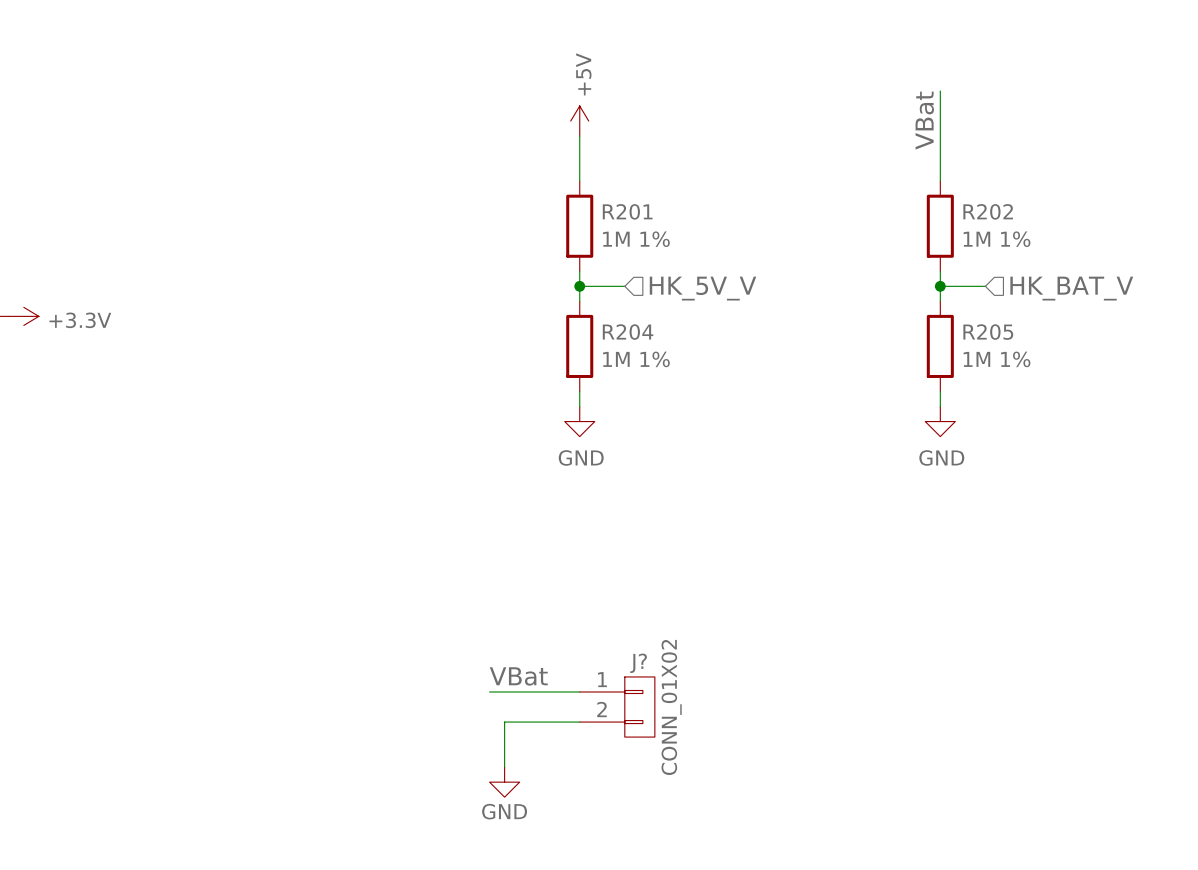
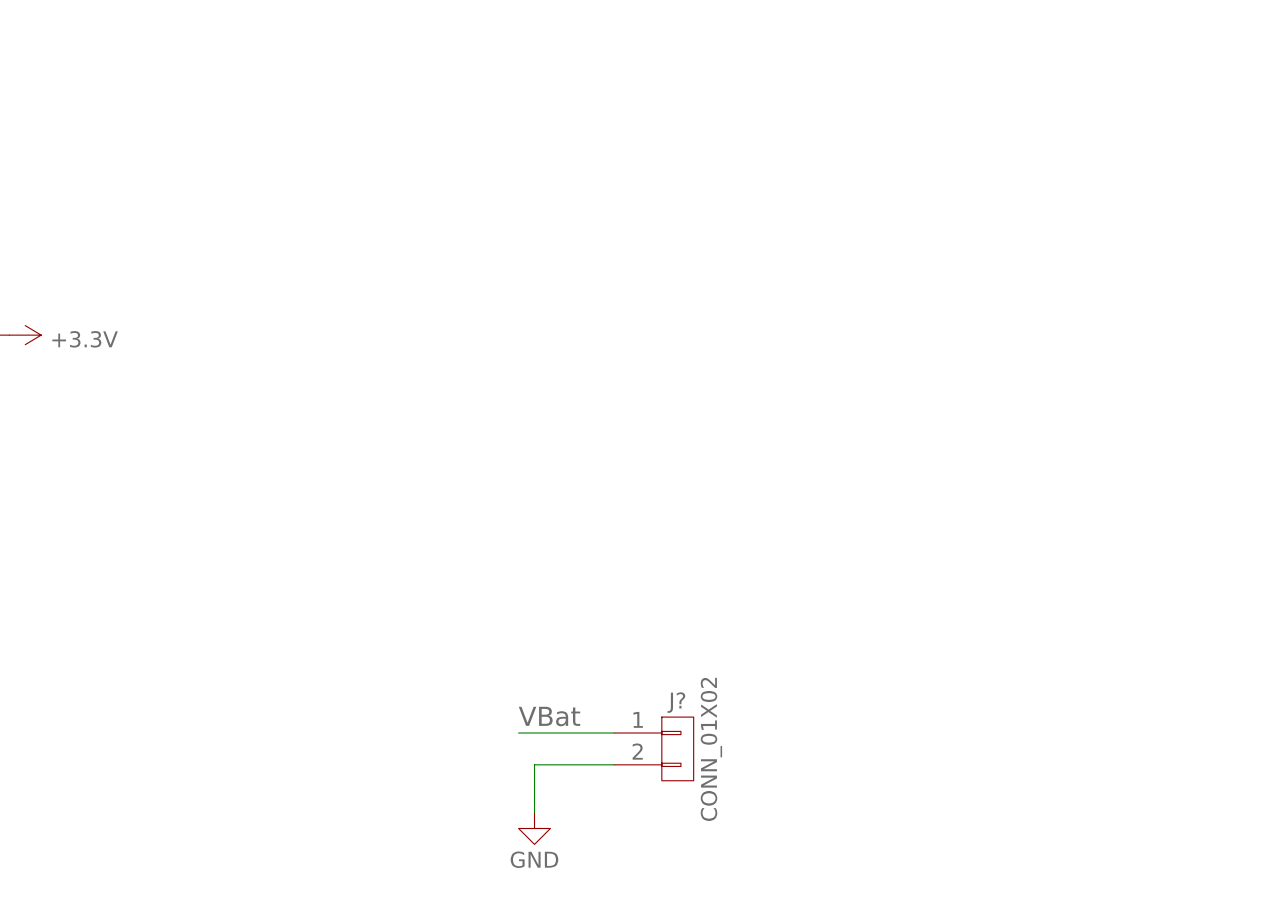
wire: (940, 91) (940, 181) -> none
label: VBat (924, 120) -> none
power symbol: +5V (579, 121) -> none
wire: (579, 136) (579, 181) -> none
R201: 1M 1% (579, 226) -> none
R202: 1M 1% (940, 226) -> none
wire: (579, 271) (579, 301) -> none
wire: (940, 271) (940, 301) -> none
wire: (579, 286) (624, 286) -> none
junction: (579, 286) -> none
wire: (940, 286) (985, 286) -> none
junction: (940, 286) -> none
hierarchical label: HK_5V_V (703, 288) -> none
hierarchical label: HK_BAT_V (1071, 288) -> none
R204: 1M 1% (579, 346) -> none
R205: 1M 1% (940, 346) -> none
wire: (579, 391) (579, 406) -> none
wire: (940, 391) (940, 406) -> none
power symbol: GND (579, 421) -> none
power symbol: GND (940, 421) -> none

